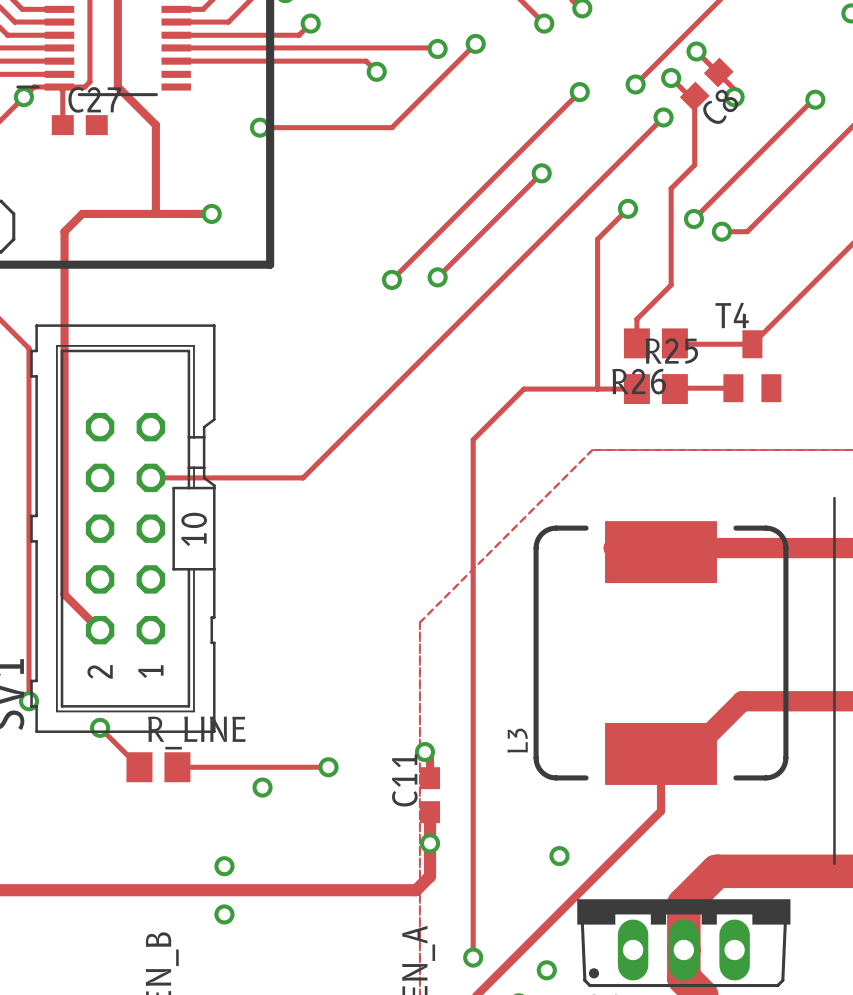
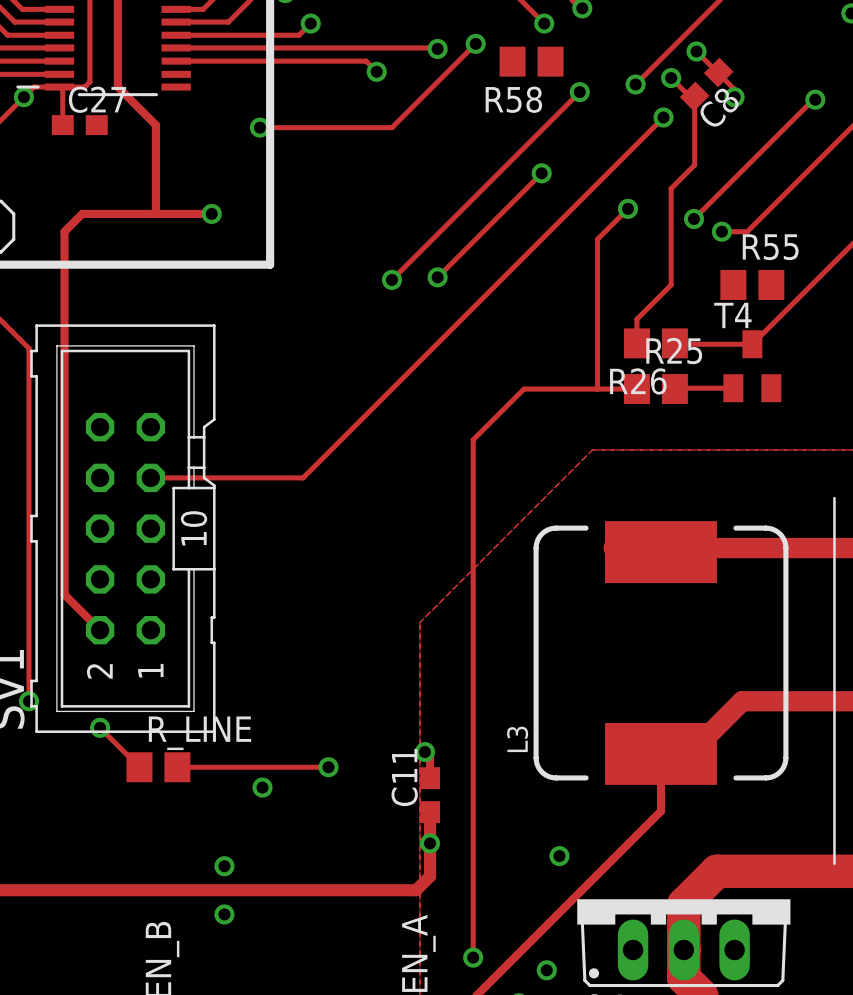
R58: none -> (531, 61)
R55: none -> (752, 285)

